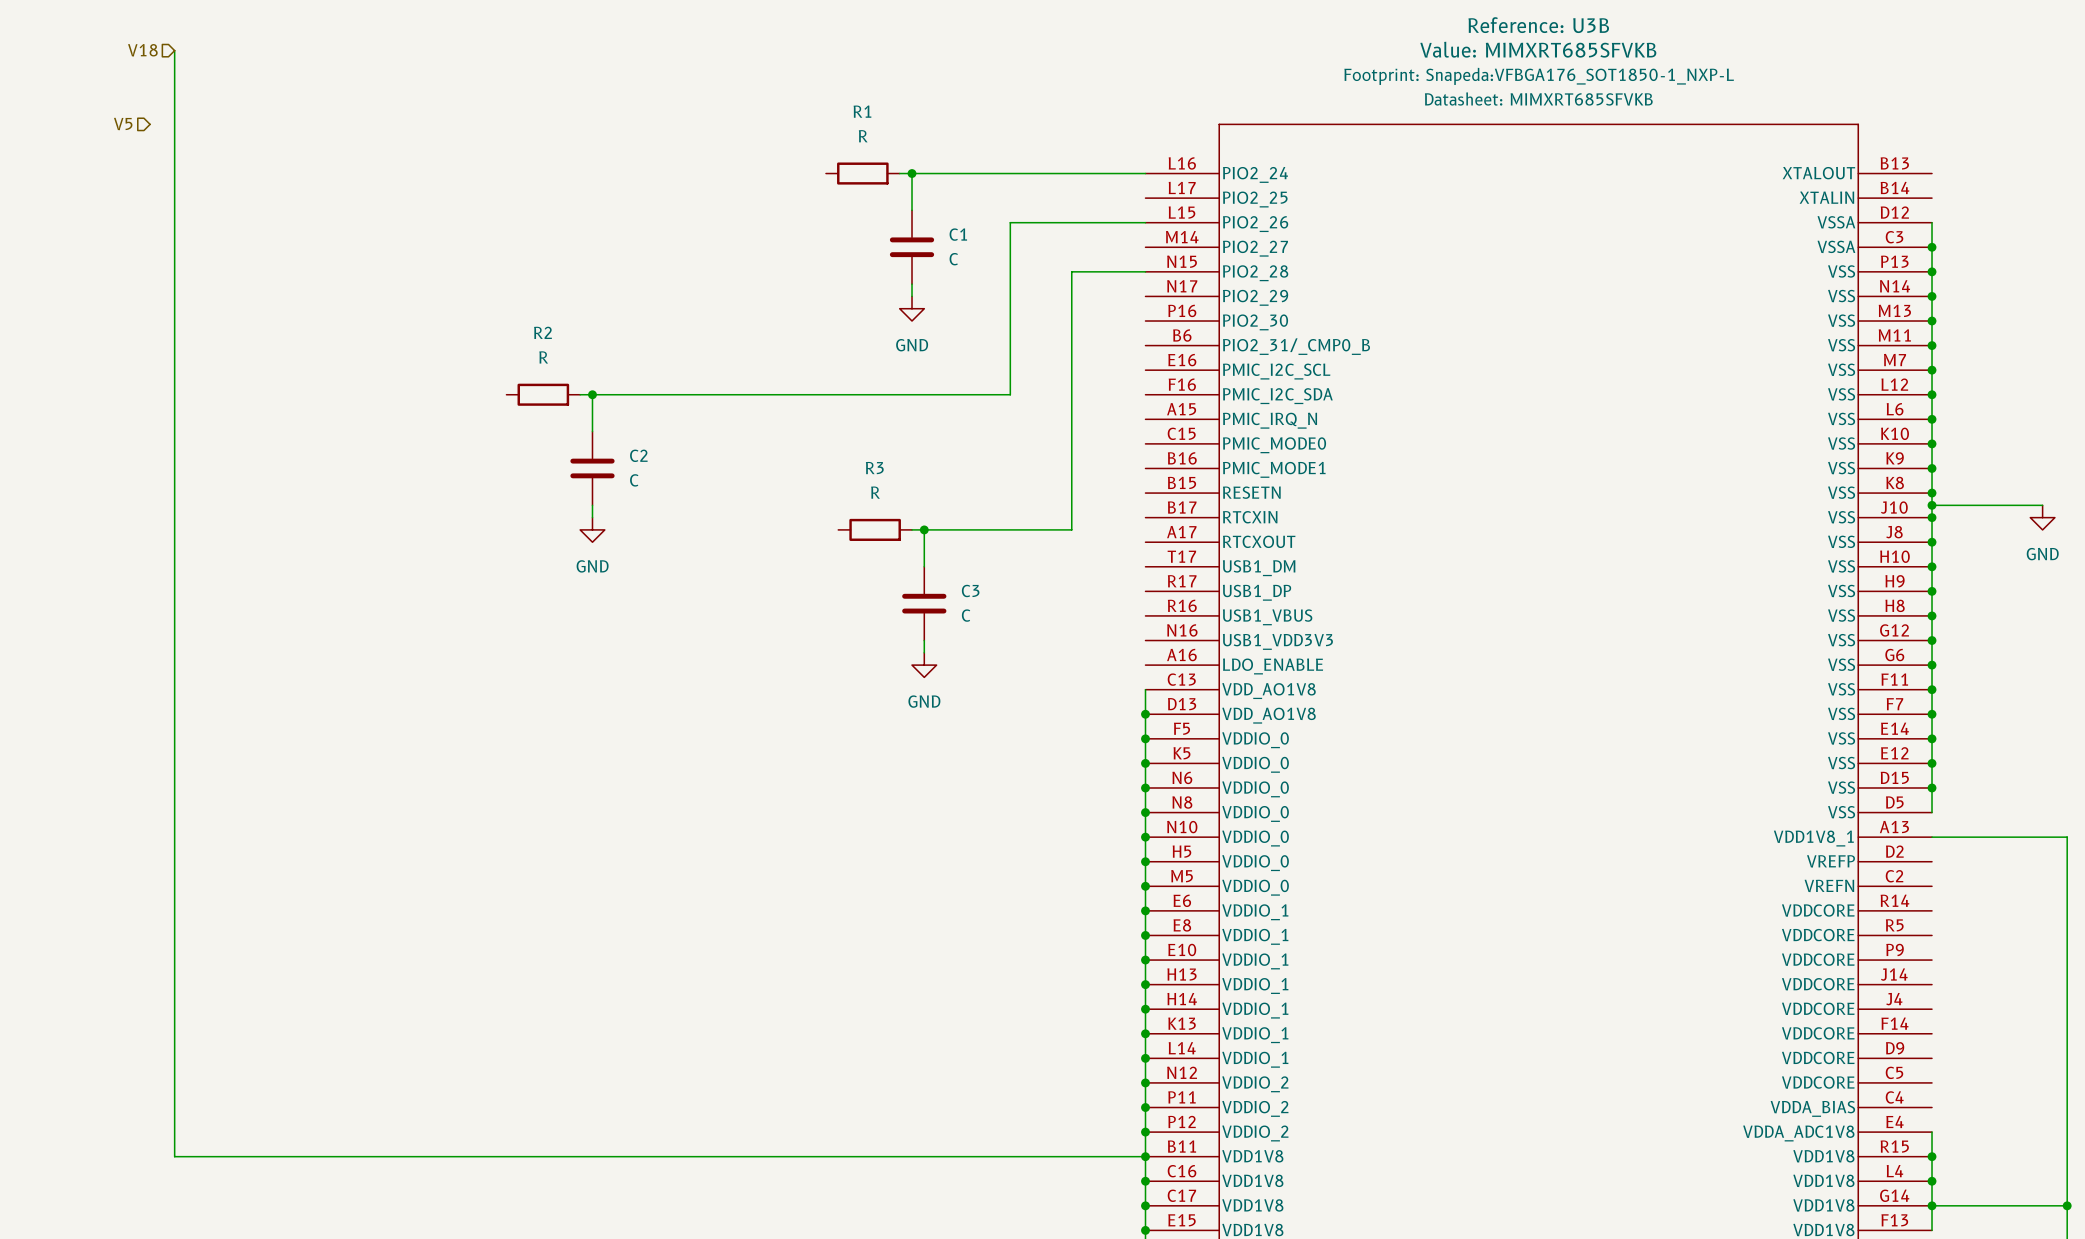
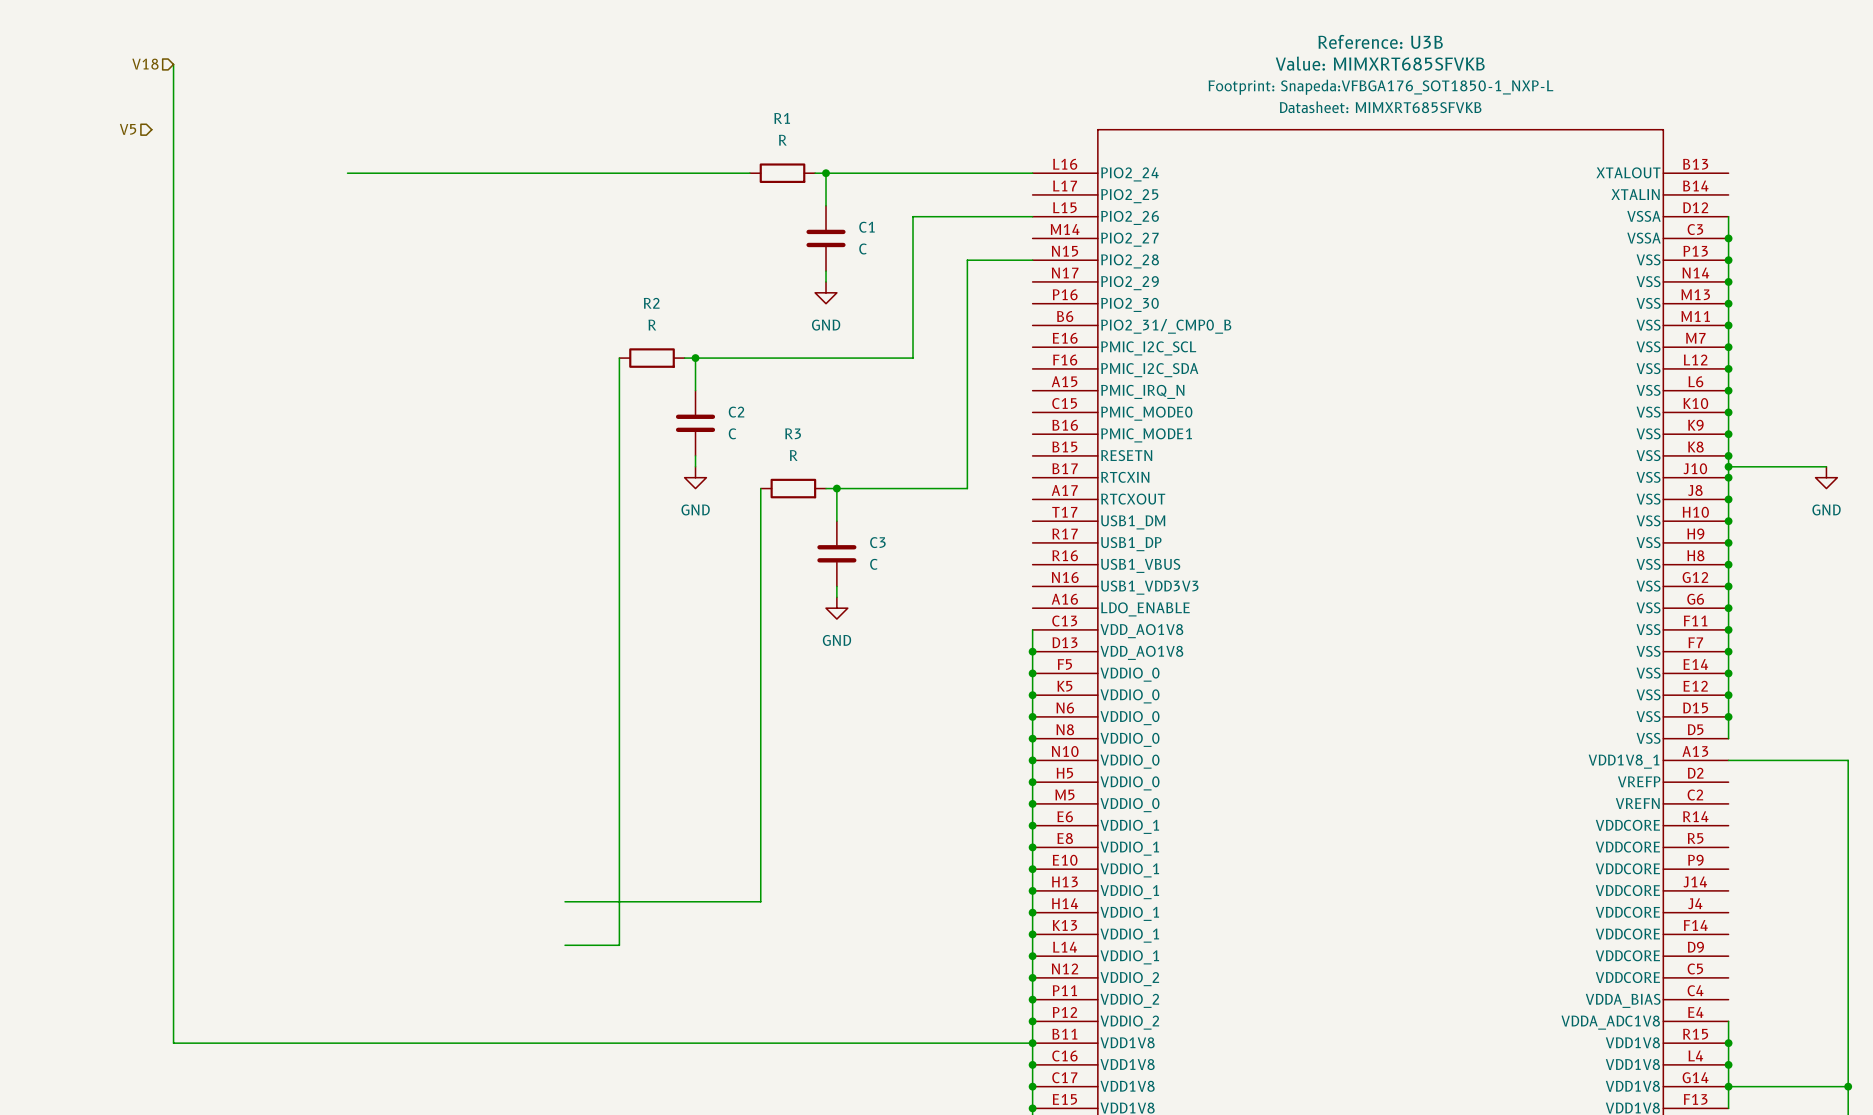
wire: none -> (347, 173) (749, 173)
wire: none -> (619, 358) (619, 945) (565, 945)
junction: none -> (695, 358)
wire: (1010, 382) (1010, 394) (580, 394) -> (913, 358) (684, 358)
R2 position: (543, 394) -> (652, 358)
wire: (592, 394) (592, 431) -> (695, 358) (695, 390)
junction: (592, 394) -> none
C2 position: (592, 468) -> (695, 423)
wire: (592, 505) (592, 517) -> (695, 455) (695, 466)
power symbol position: GND (592, 529) -> GND (695, 477)
wire: none -> (760, 488) (760, 901) (565, 901)

